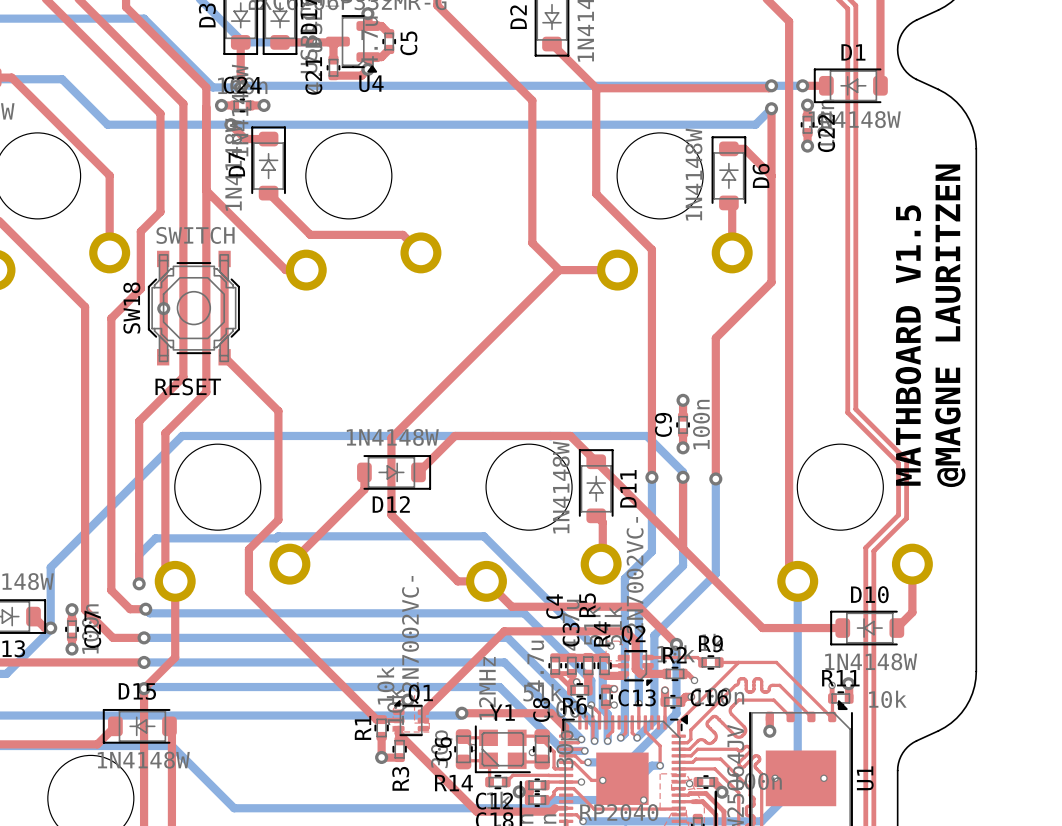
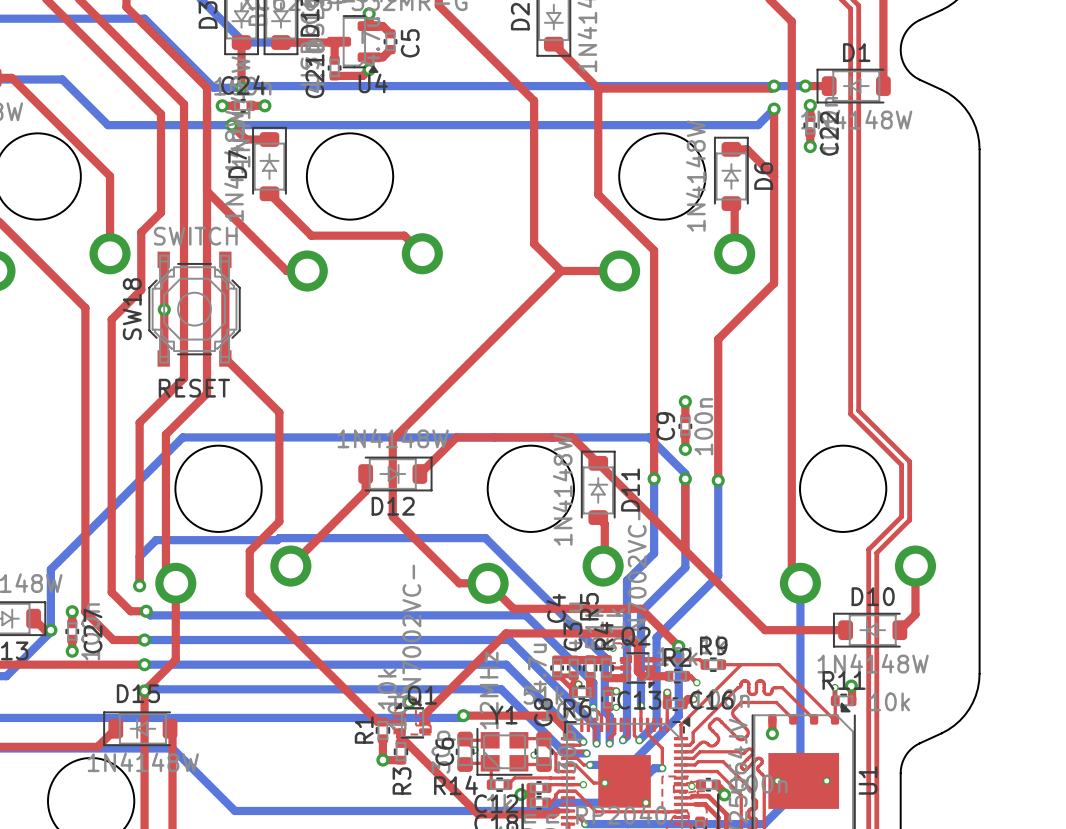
text: @MAGNE LAURITZEN (950, 325) -> none
text: MATHBOARD V1.5 (908, 345) -> none

